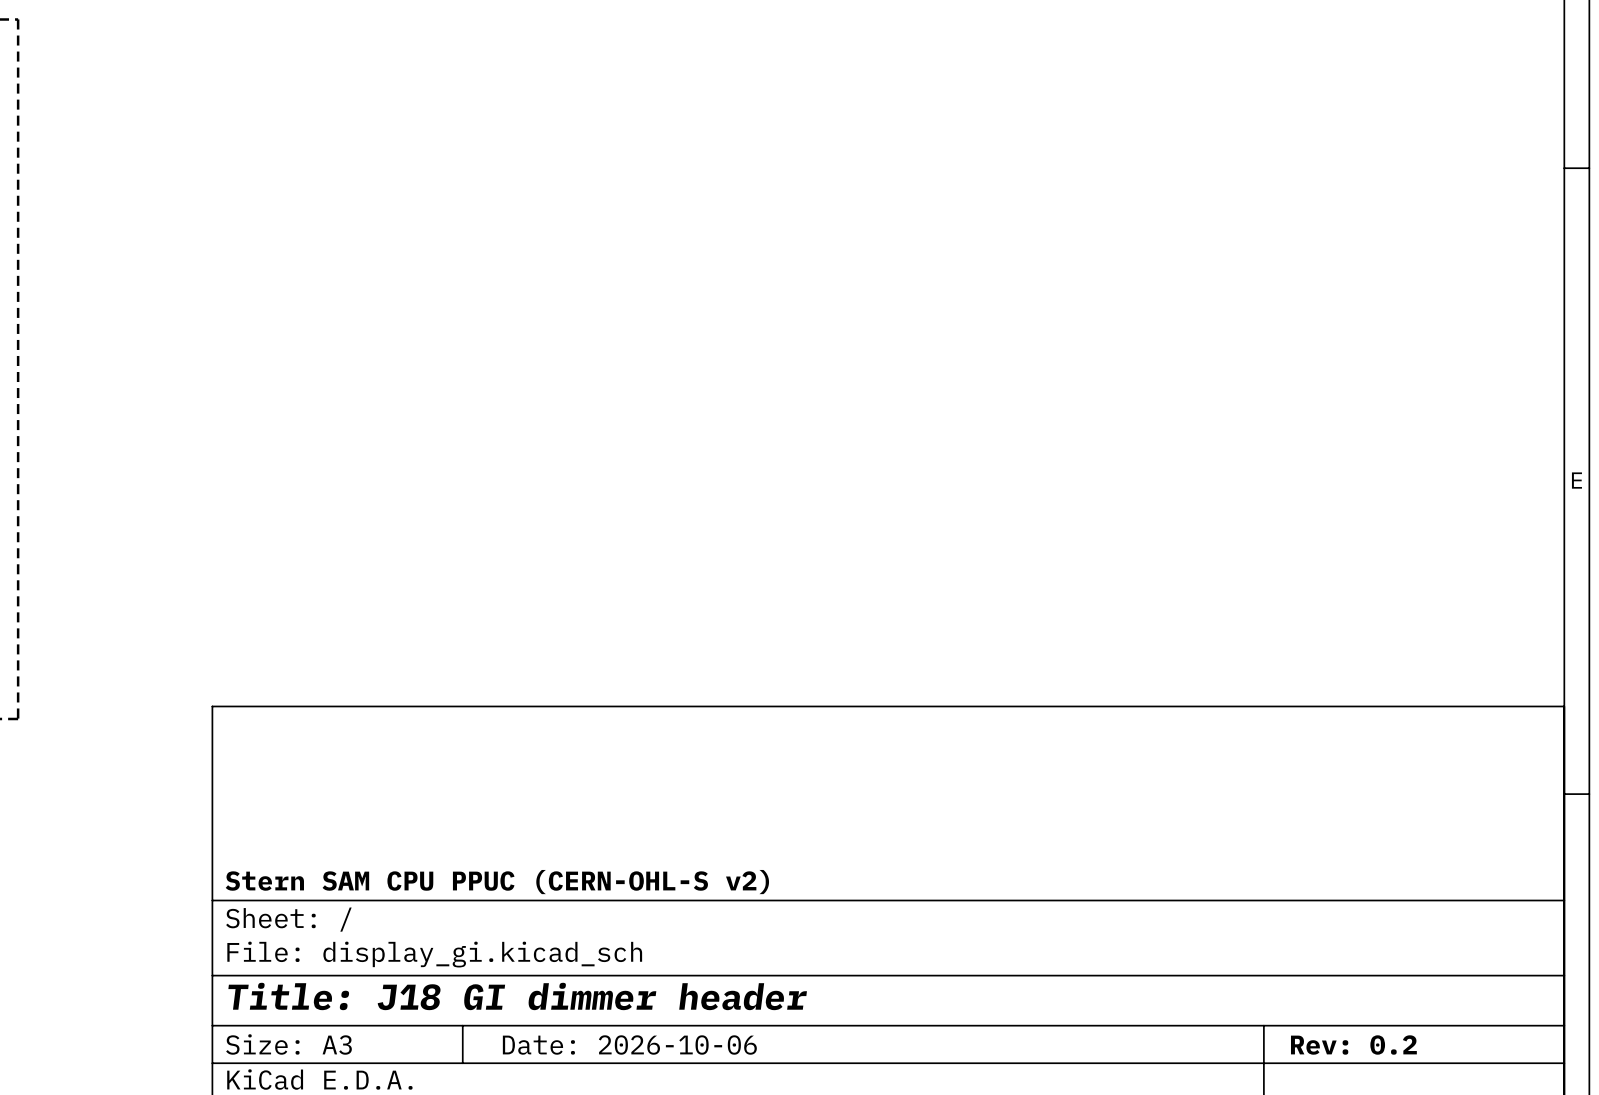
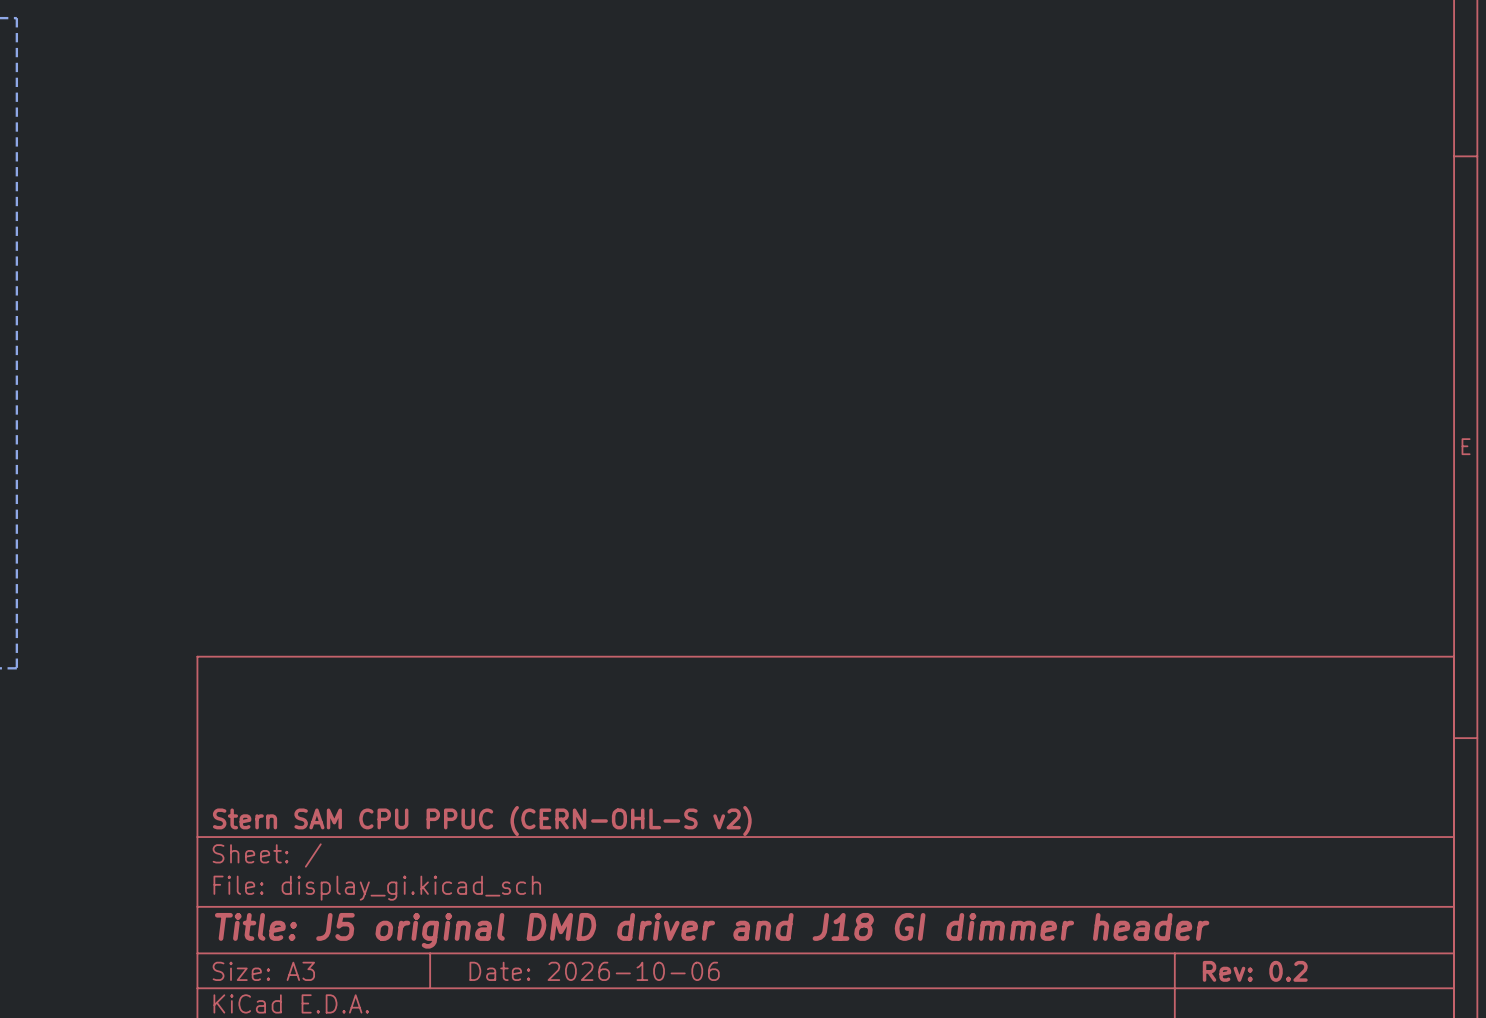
title block: Title: J18 GI dimmer header (517, 996) -> Title: J5 original DMD driver and J18 GI dimmer header (712, 930)

